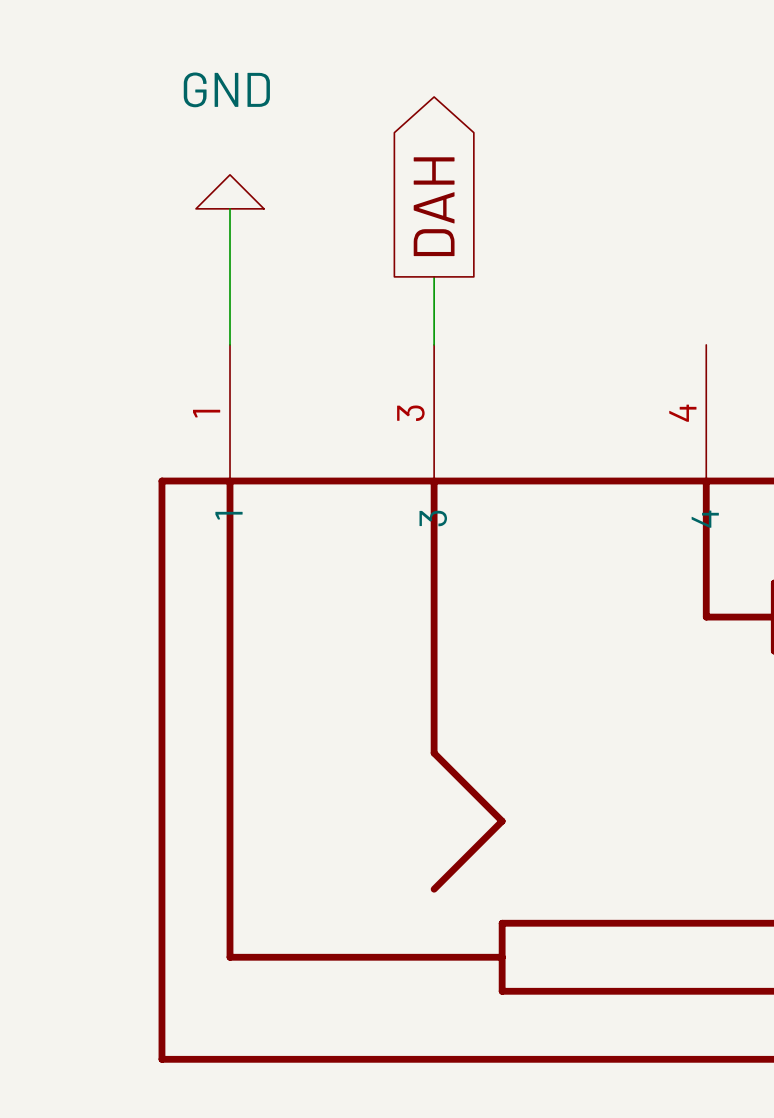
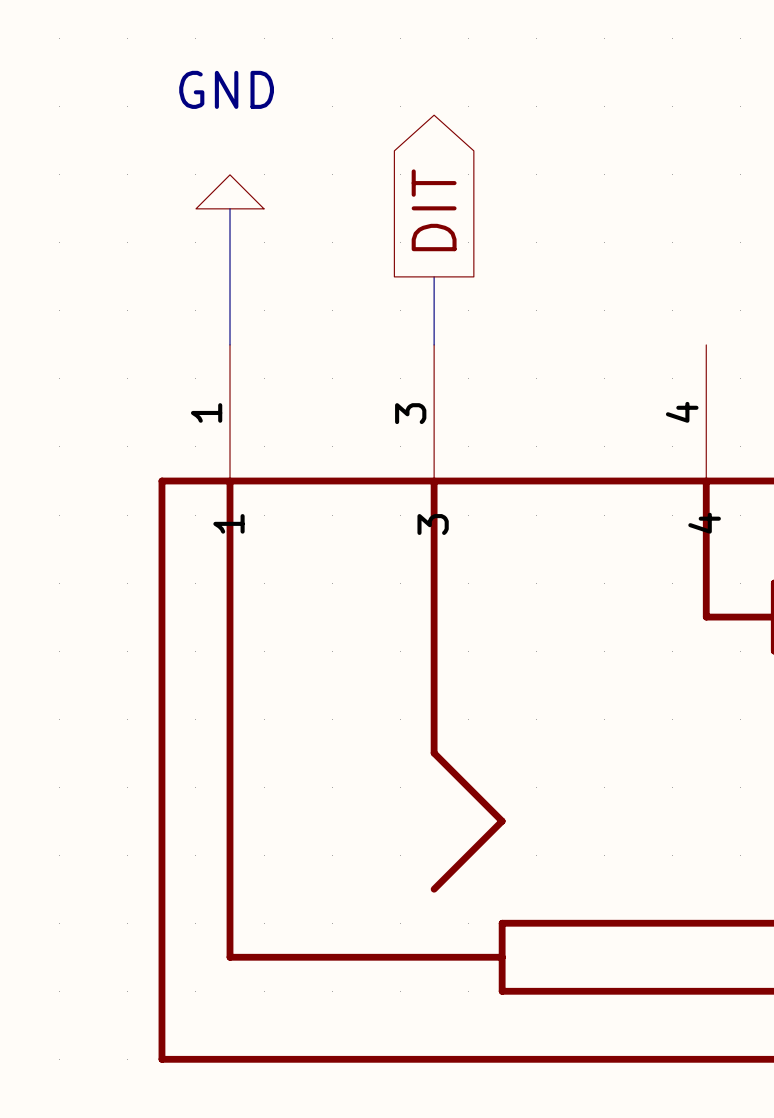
global label: DAH (434, 206) -> DIT (434, 210)

